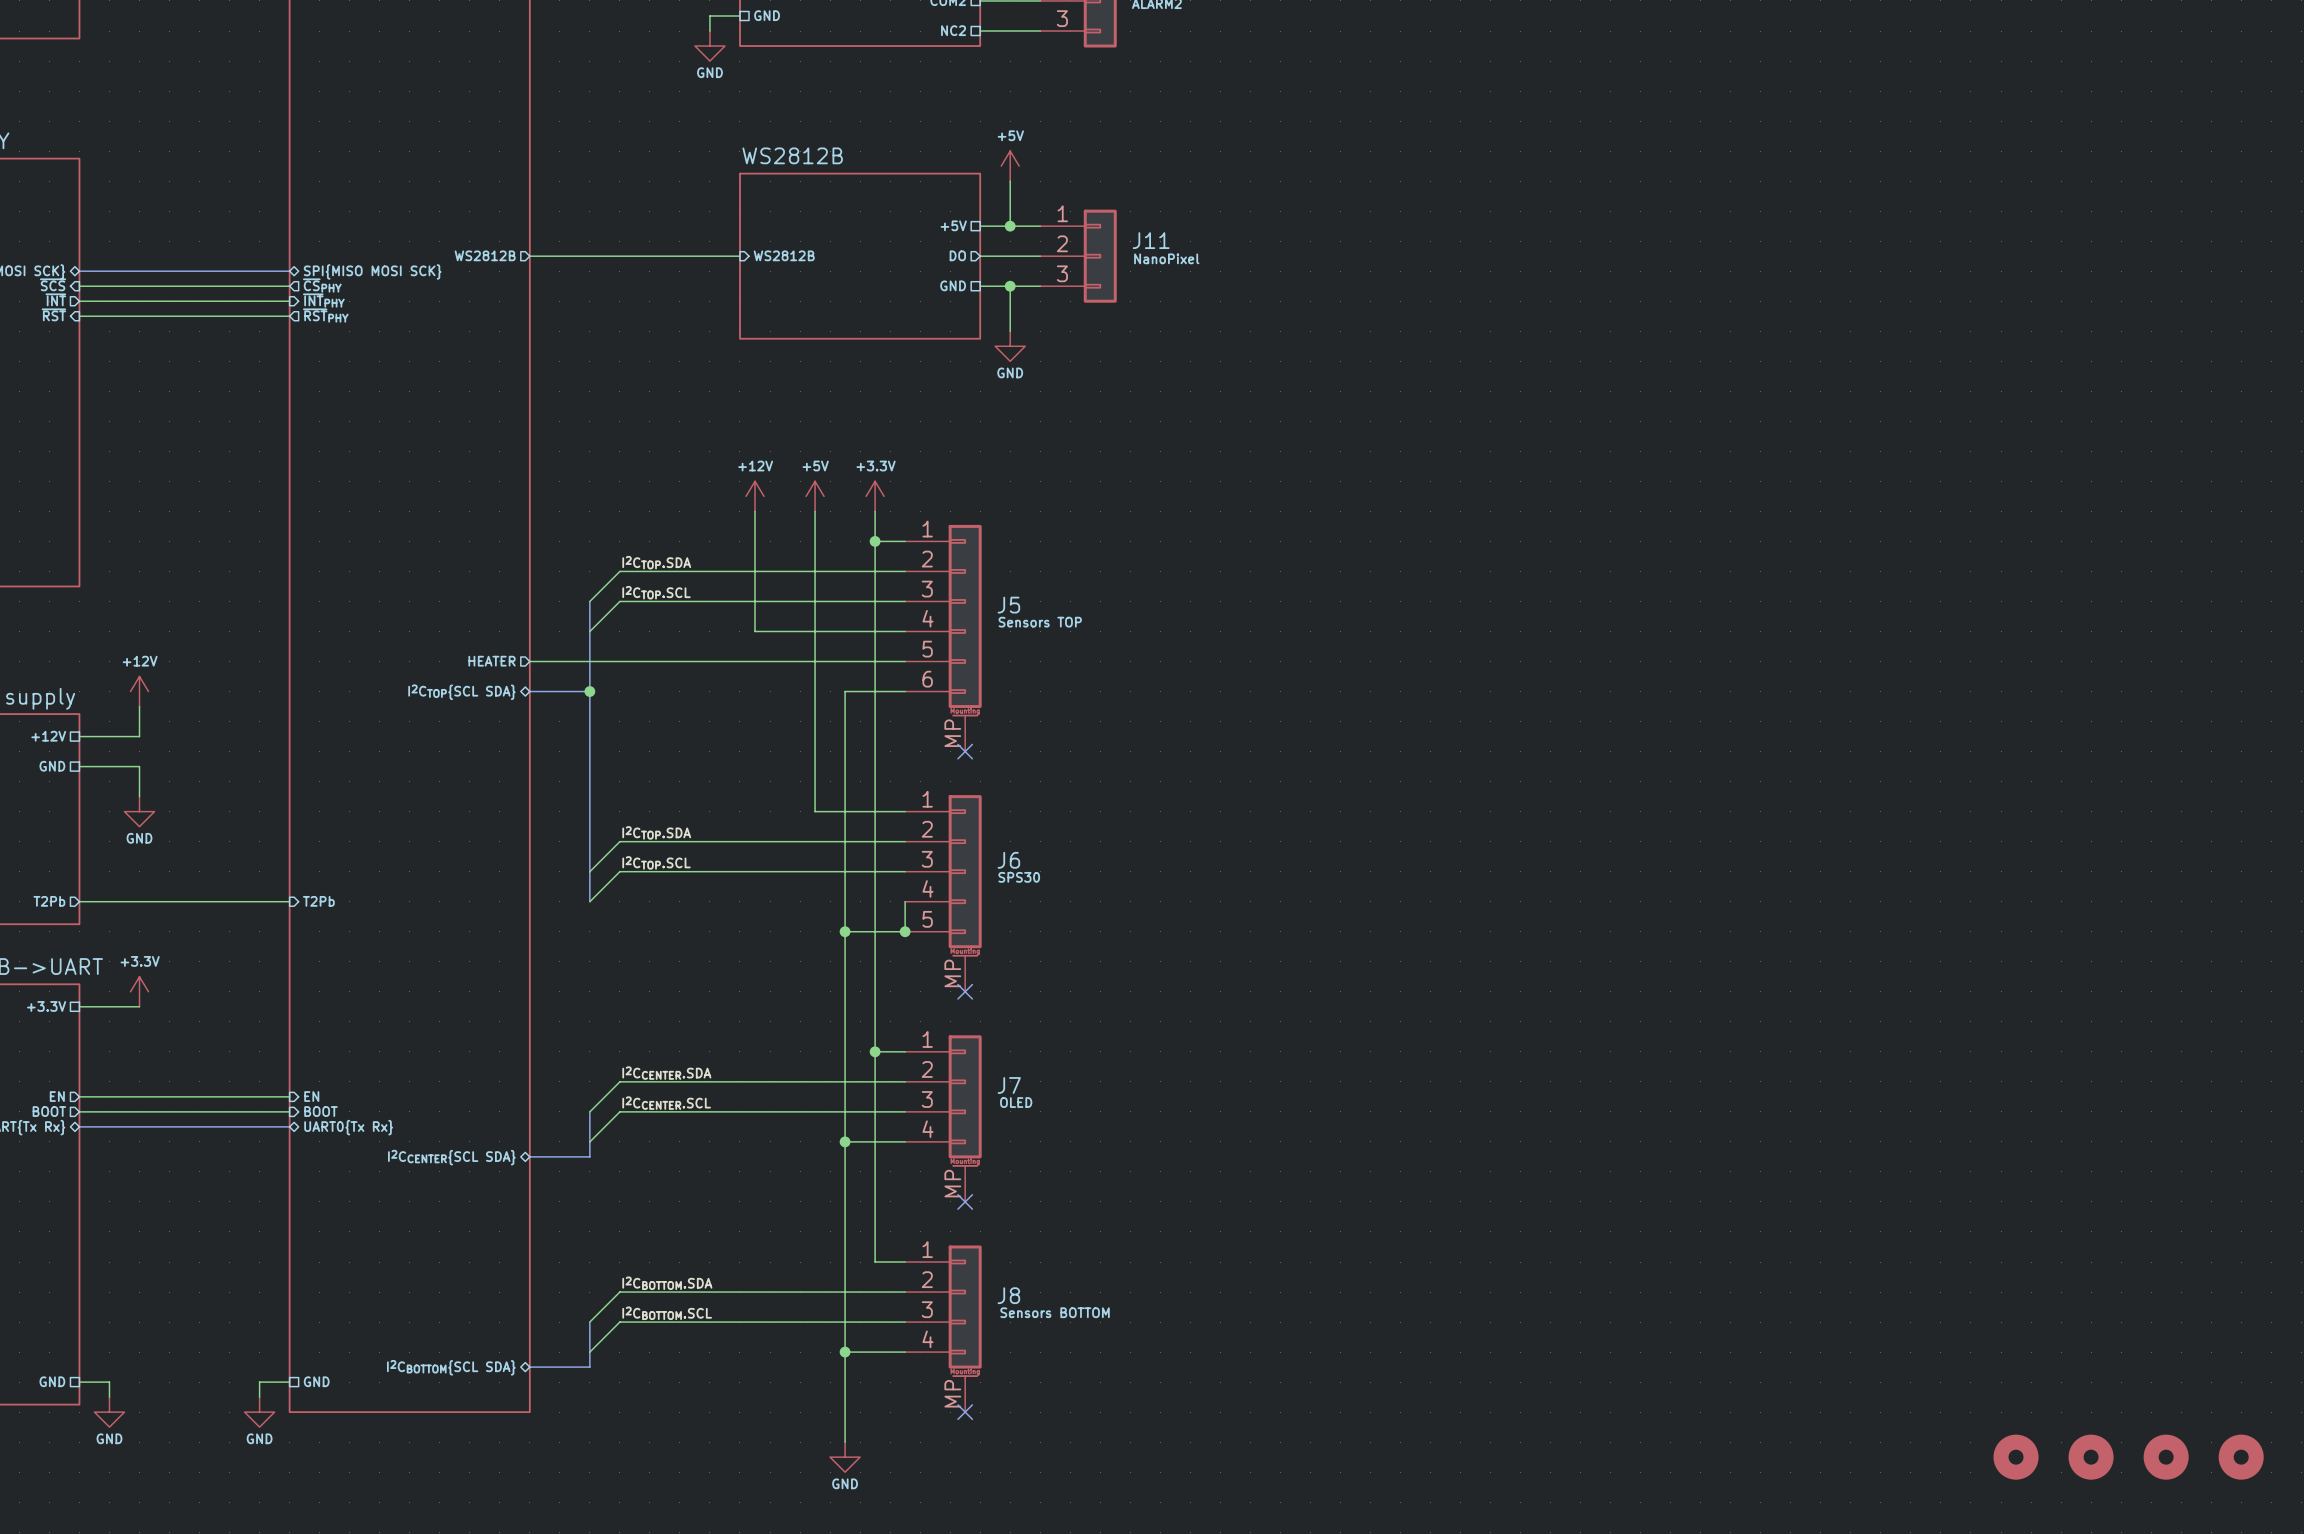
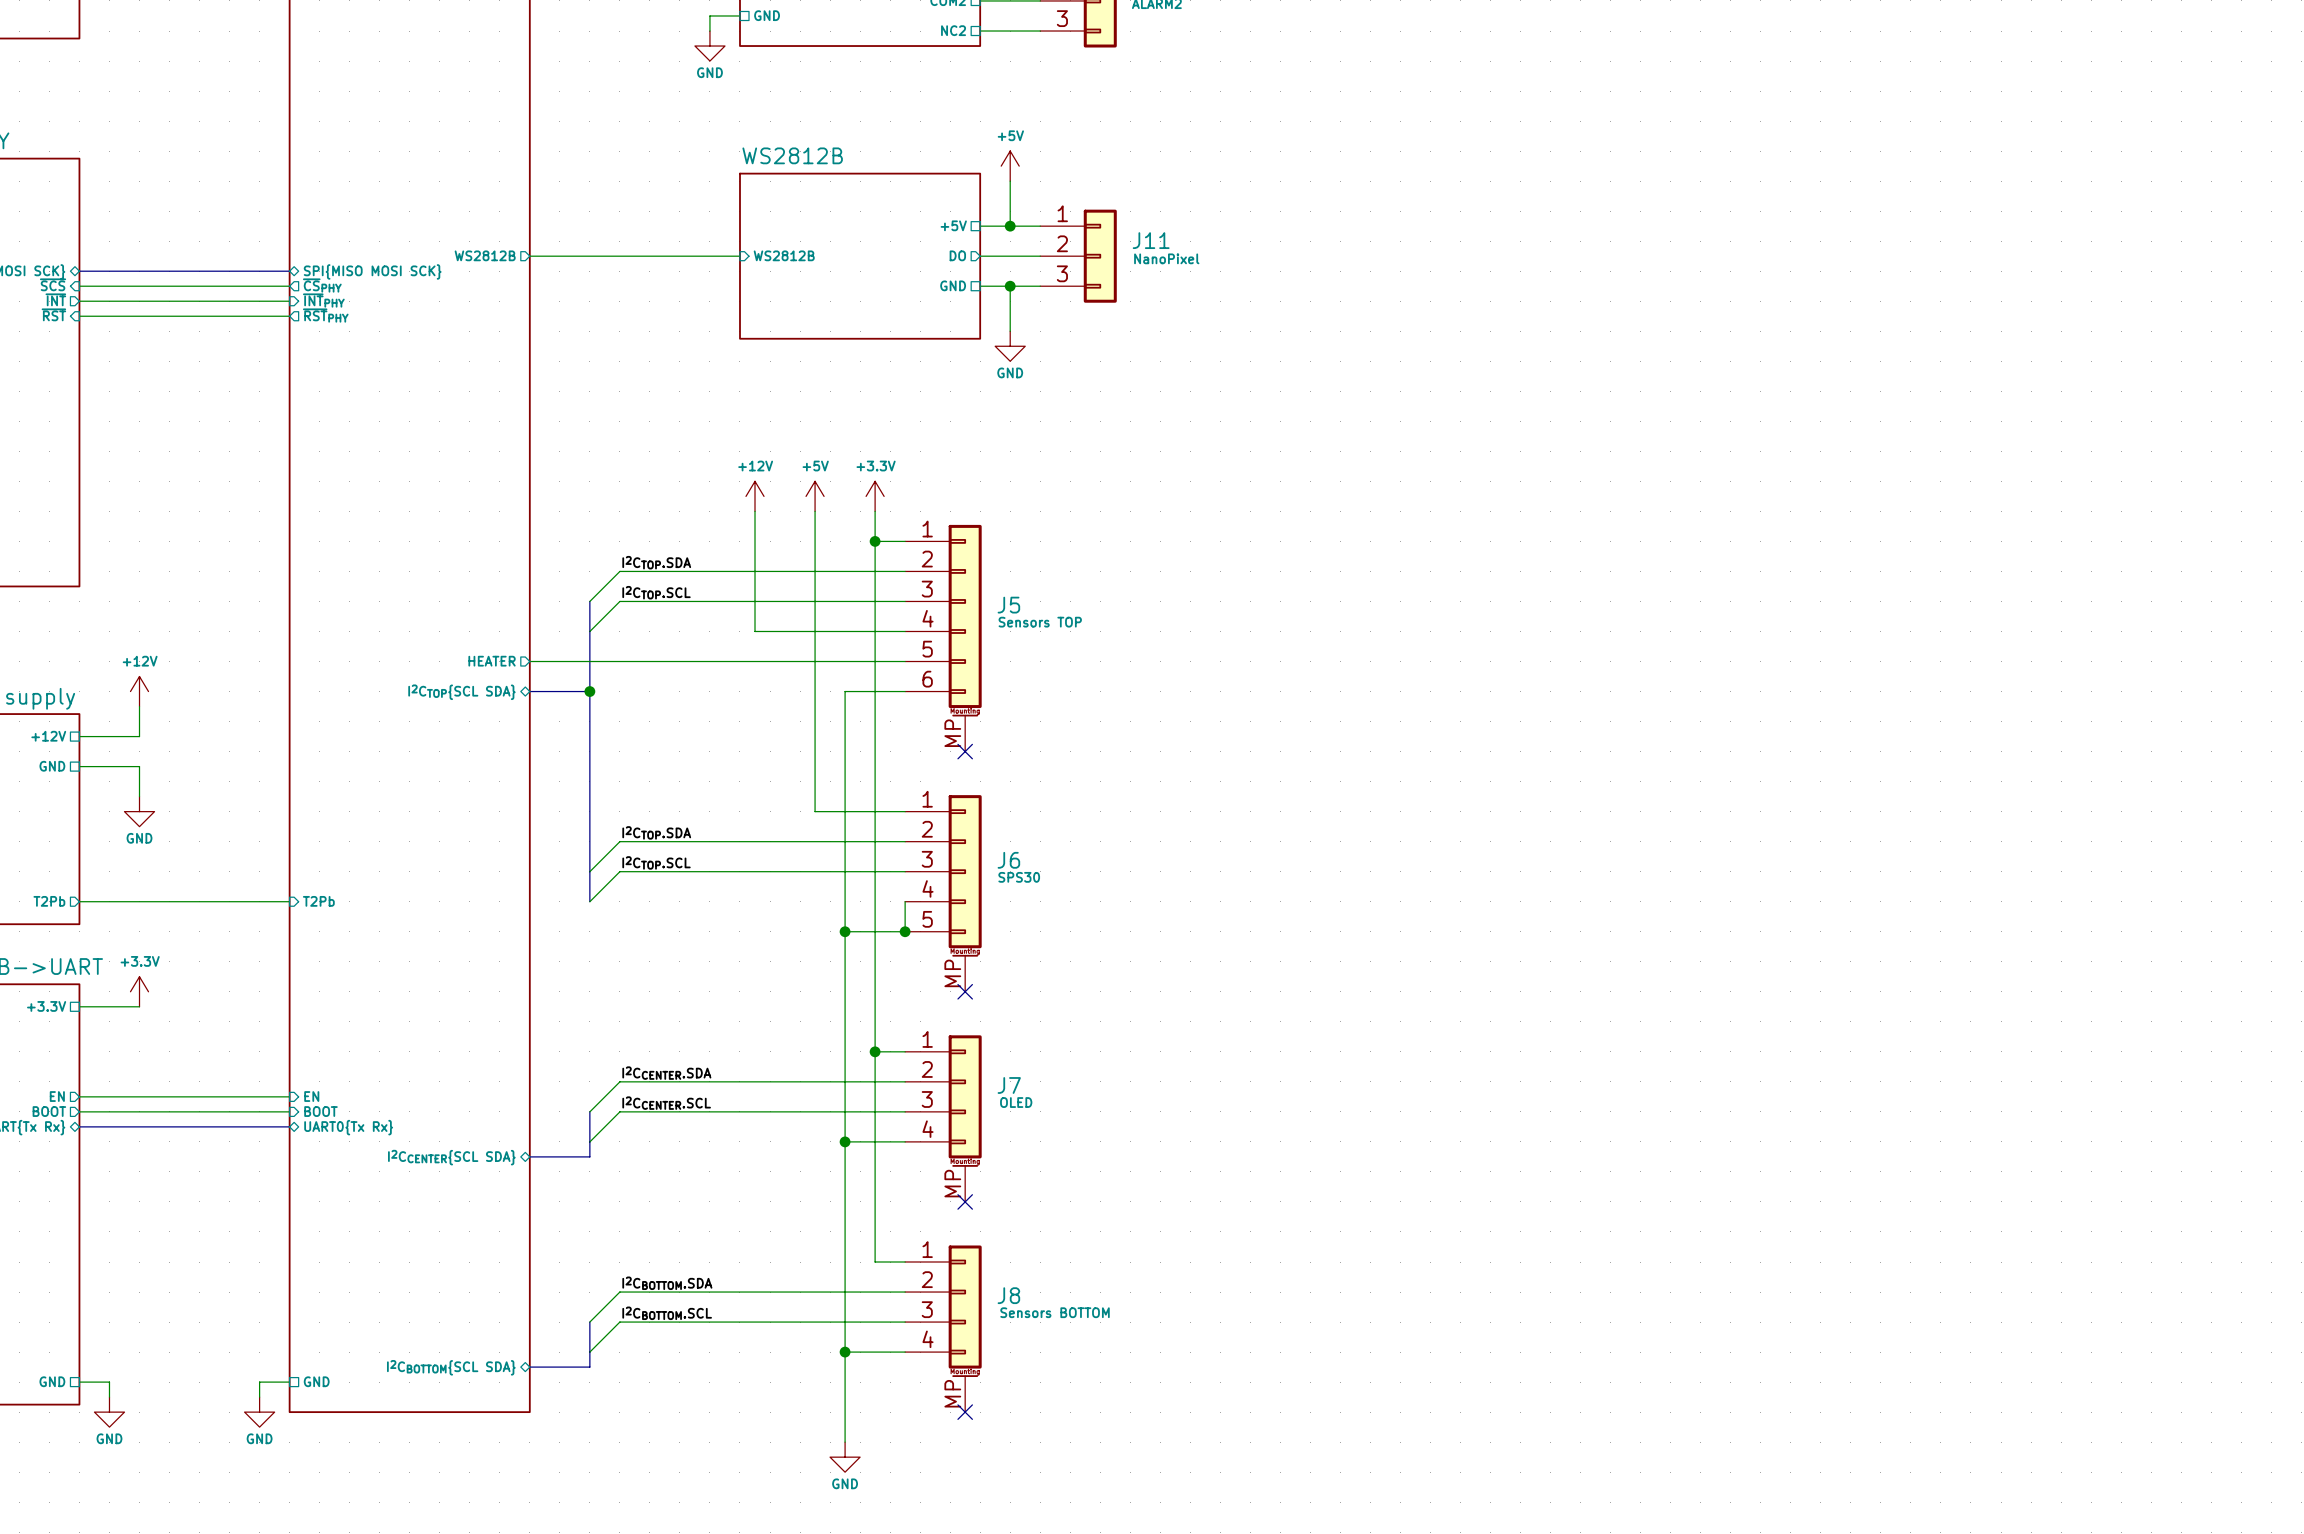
part: (2016, 1457) -> none
part: (2091, 1457) -> none
part: (2166, 1457) -> none
part: (2241, 1457) -> none

